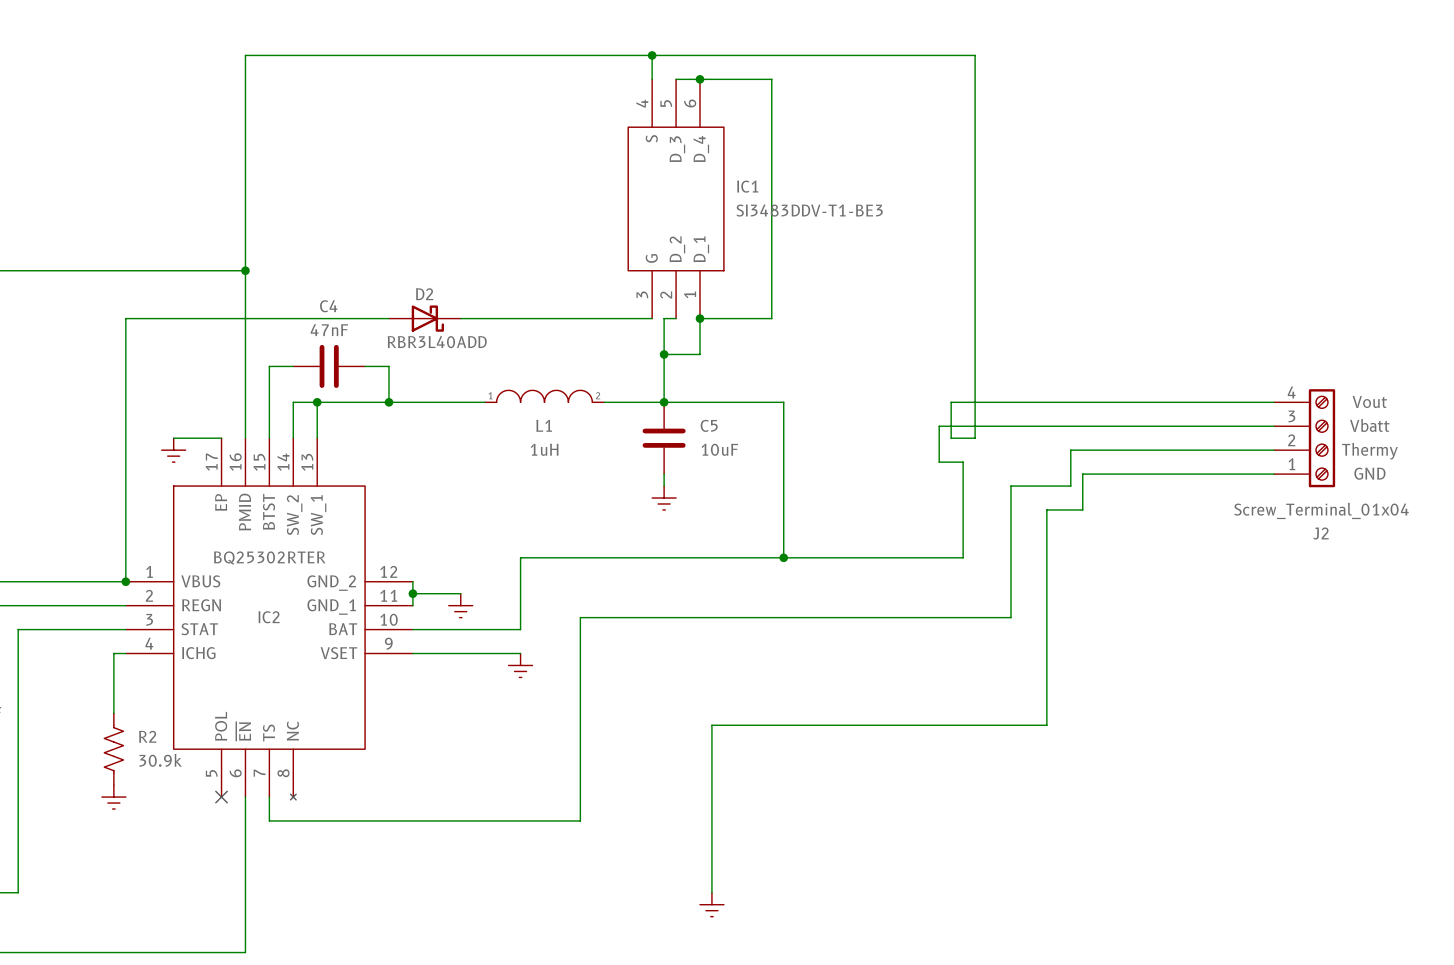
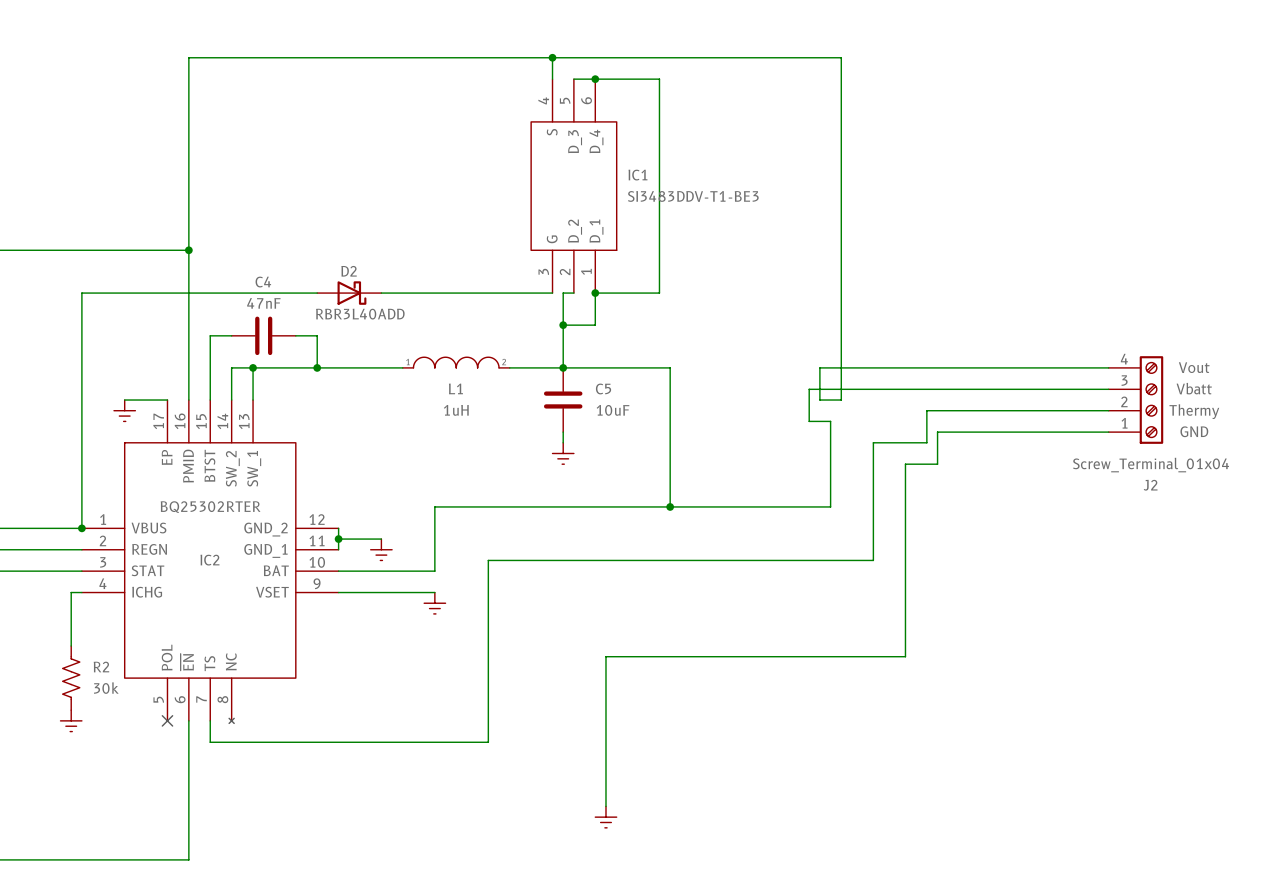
R2 value: 30.9k (160, 760) -> 30k (106, 688)

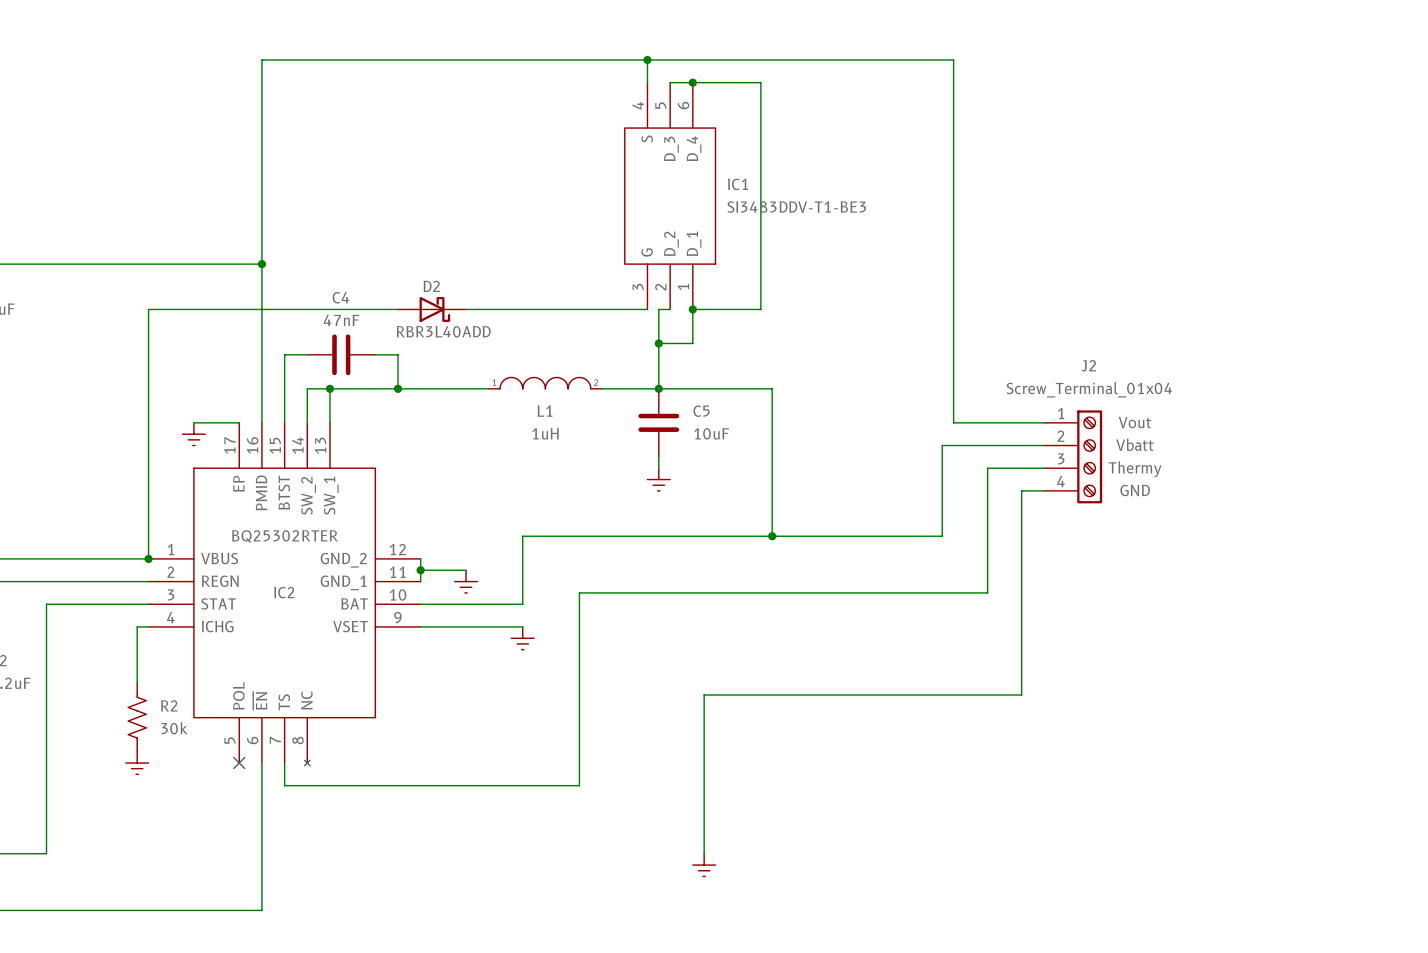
wire: (1108, 367) (819, 367) (819, 400) (841, 400) -> (1044, 422) (953, 422)
wire: (1108, 389) (809, 389) (809, 421) (830, 421) -> (1044, 445) (942, 445)
J2 position: (1135, 400) -> (1073, 456)
J2 flip: as is (1151, 400) -> up-down (1089, 456)
wire: (1108, 410) (926, 410) (926, 442) -> none
wire: (1108, 432) (937, 432) (937, 464) (926, 464) -> none

